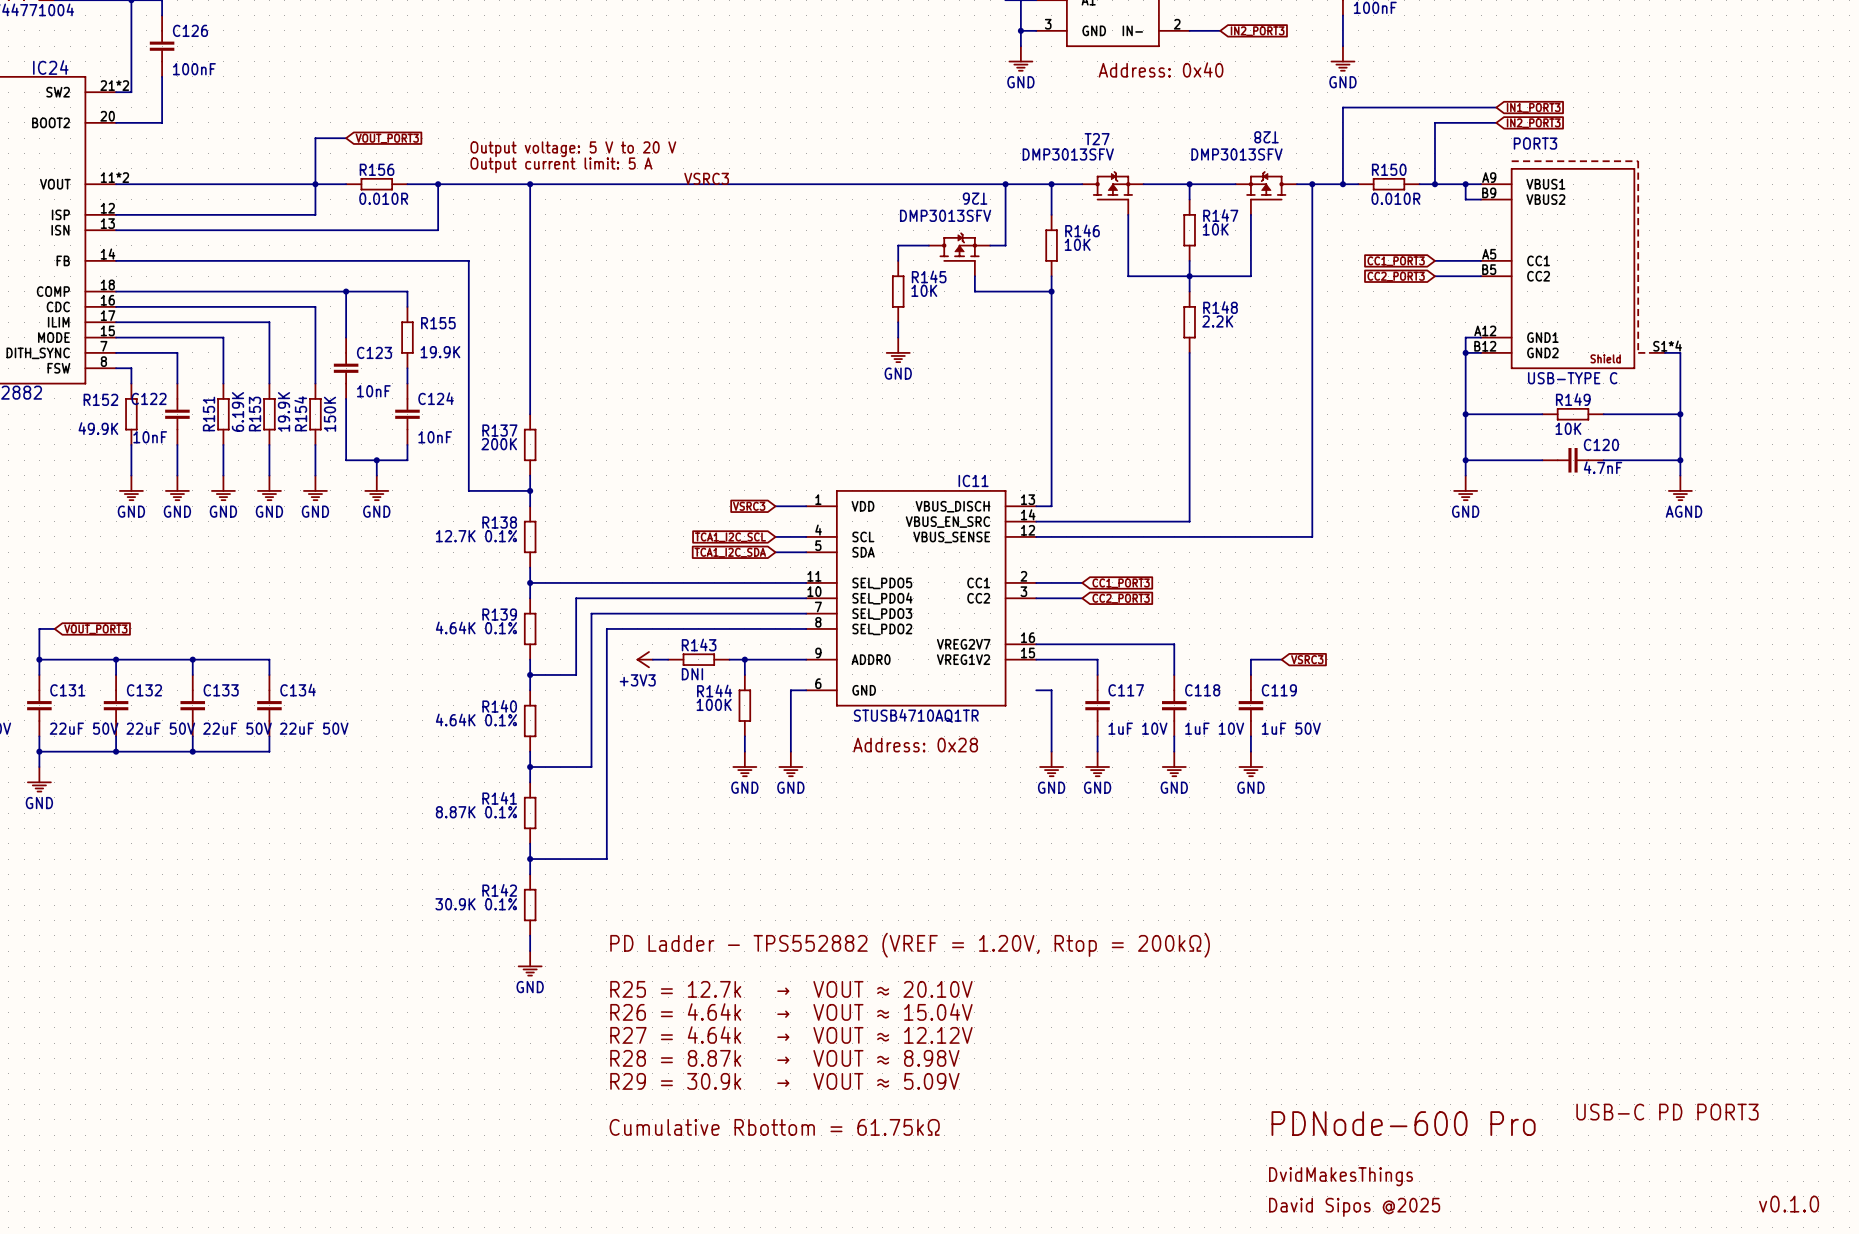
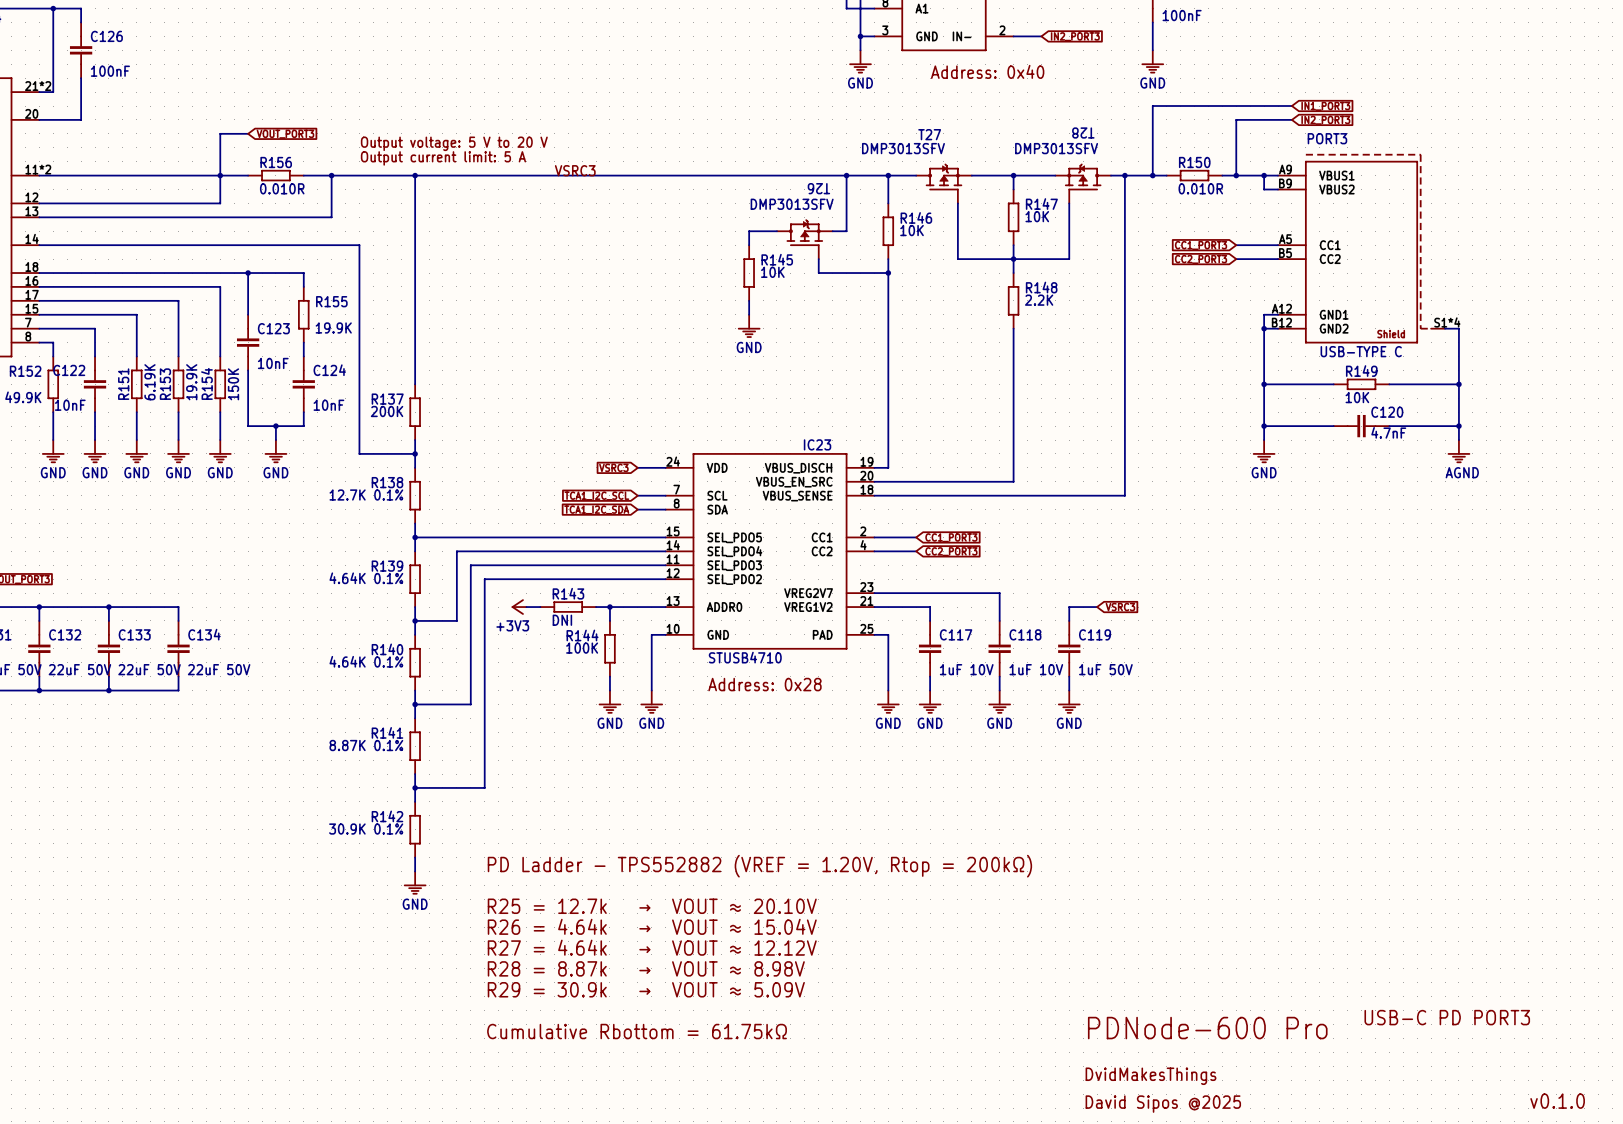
IC11: STUSB4710AQ1TR (921, 598) -> none
IC23: none -> STUSB4710 (770, 551)

